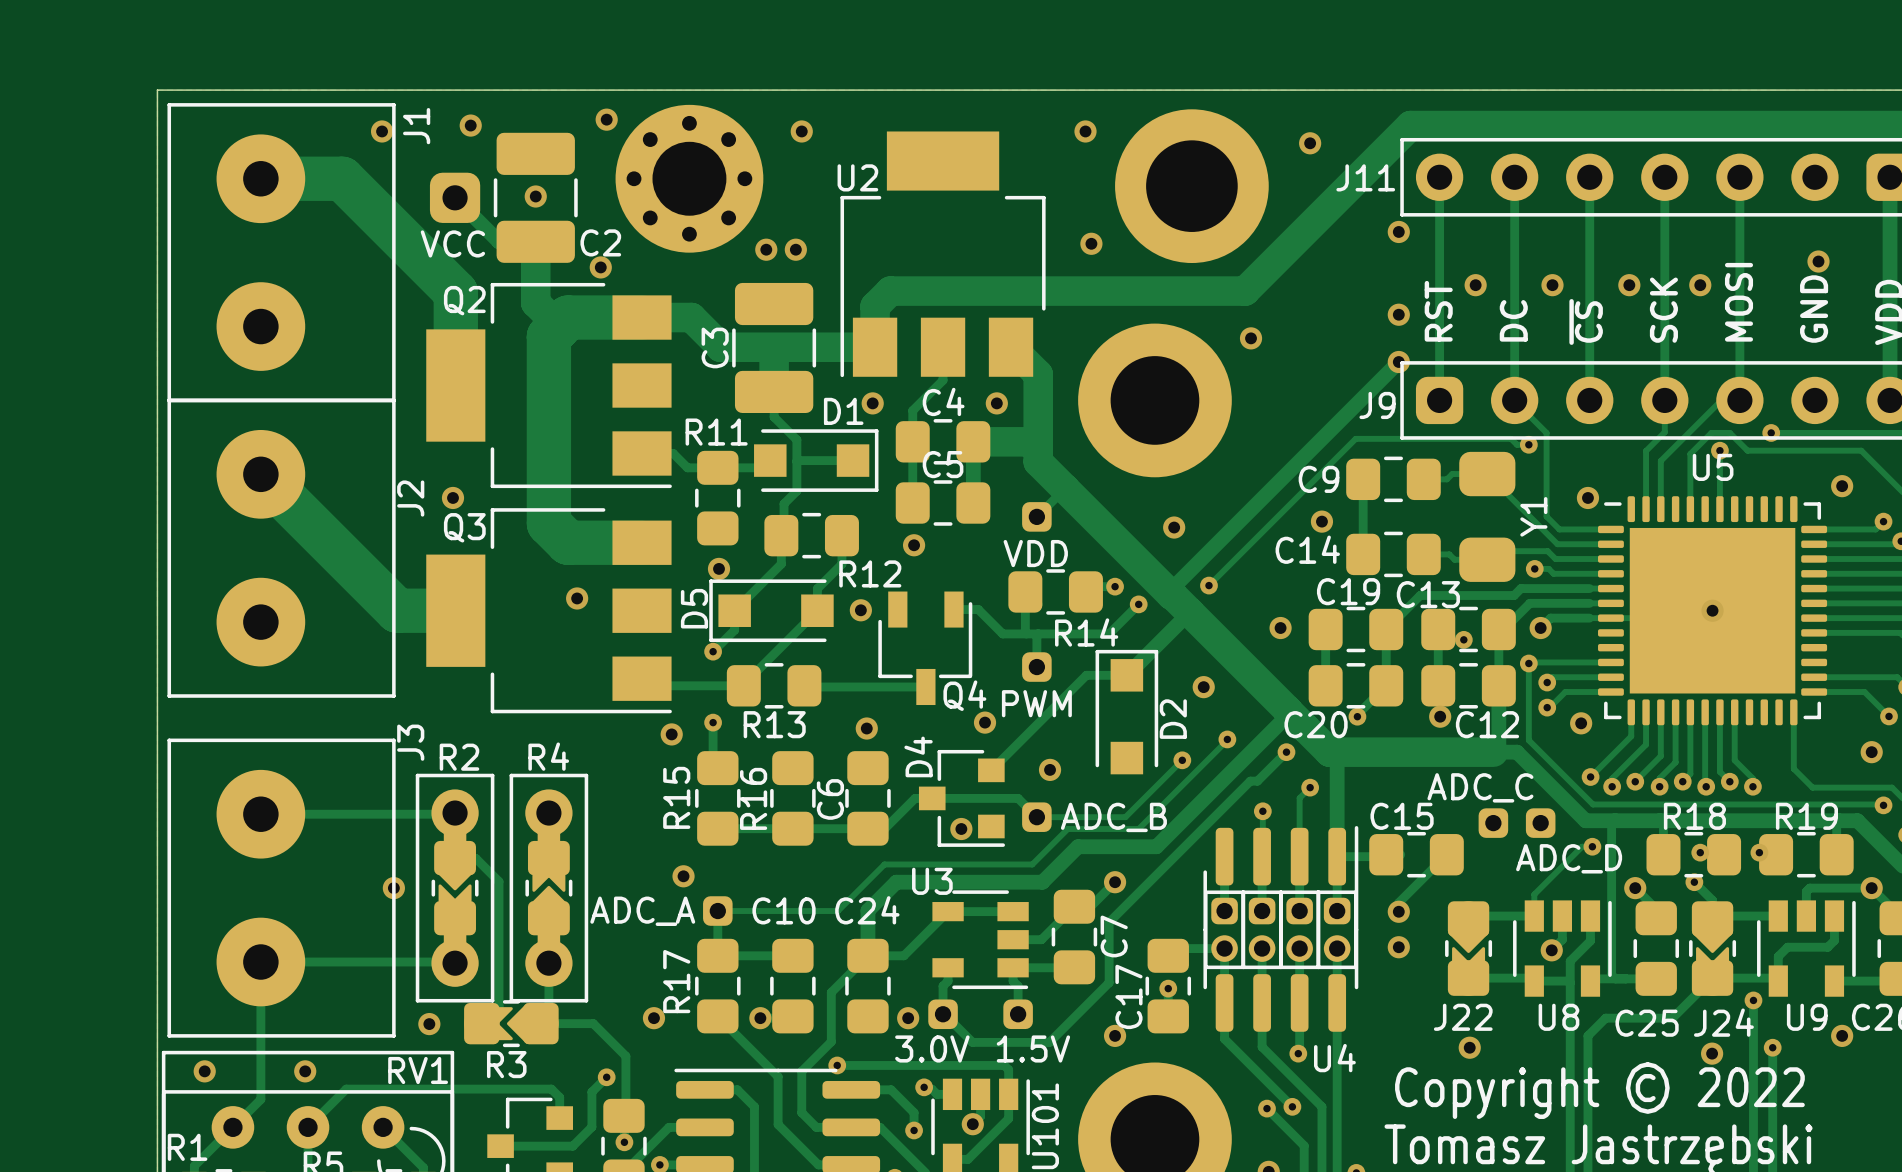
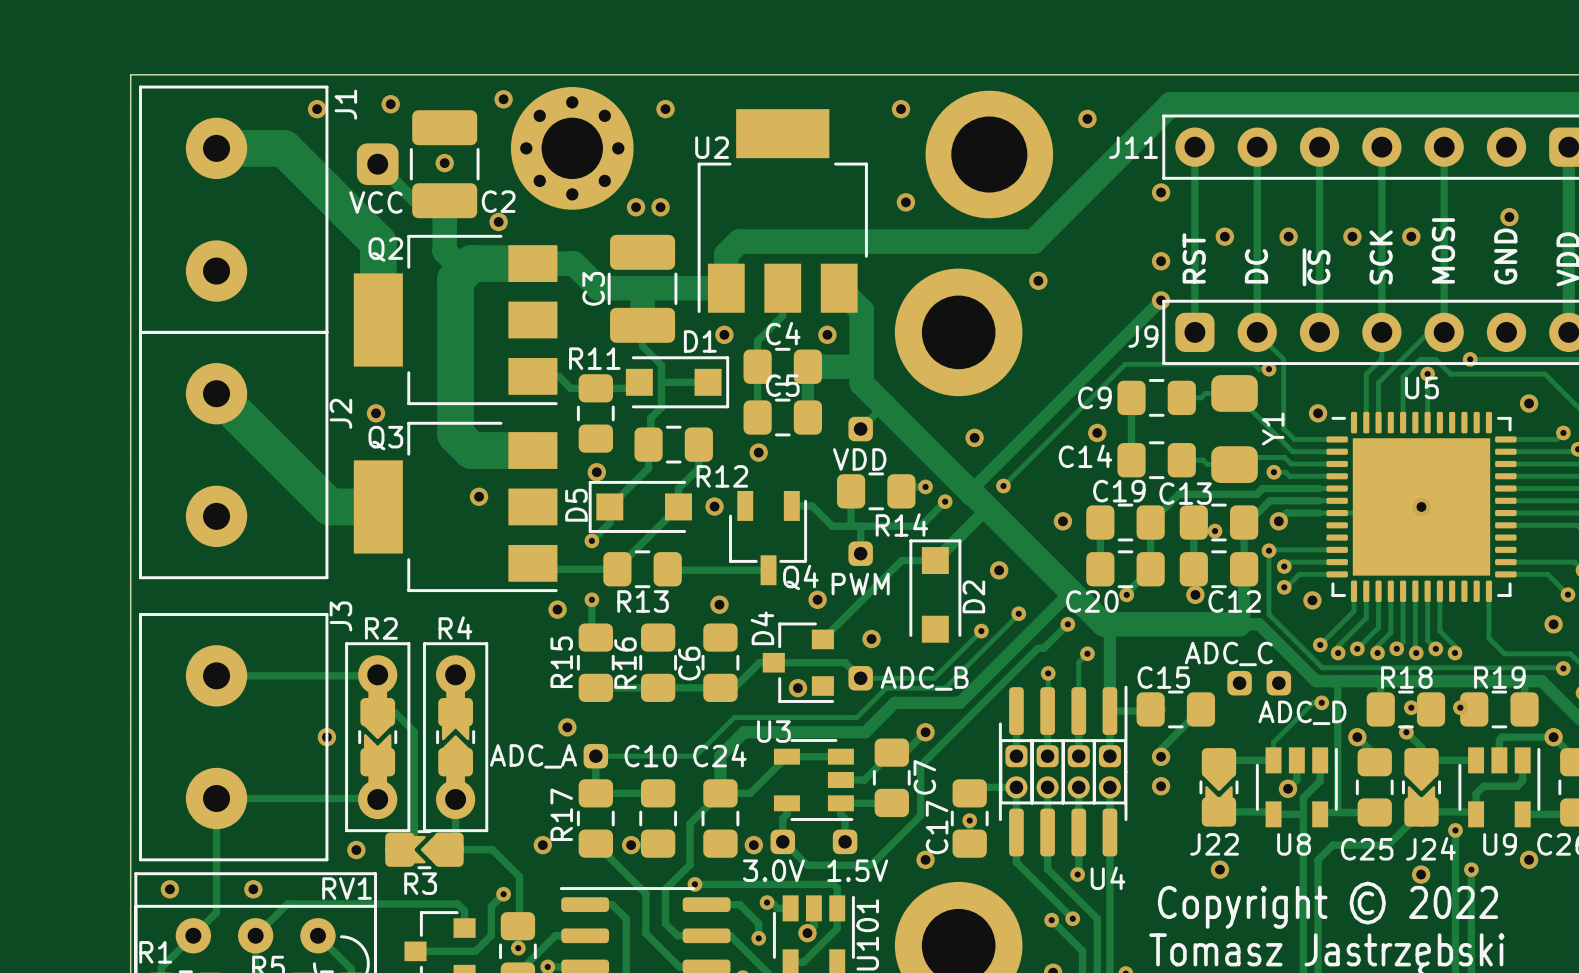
J1 footprint: [167, 103, 396, 403] -> [139, 85, 329, 334]
J2 footprint: [167, 398, 396, 698] -> [139, 330, 329, 580]
J3 footprint: [167, 738, 396, 1038] -> [139, 613, 329, 862]

